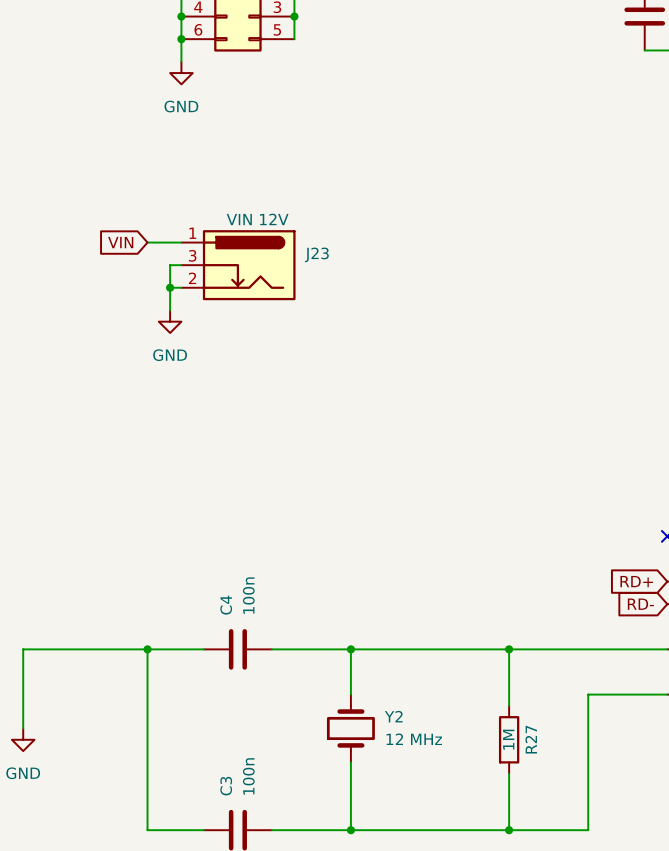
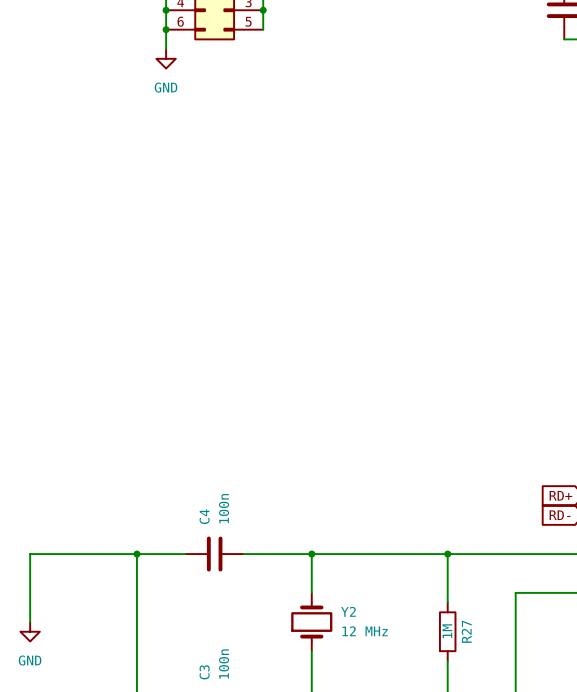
global label: VIN (120, 242) -> none
wire: (147, 242) (181, 242) -> none
wire: (181, 265) (170, 265) (170, 310) -> none
J23: VIN 12V (238, 265) -> none
wire: (170, 287) (181, 287) -> none
junction: (170, 287) -> none
power symbol: GND (170, 321) -> none

